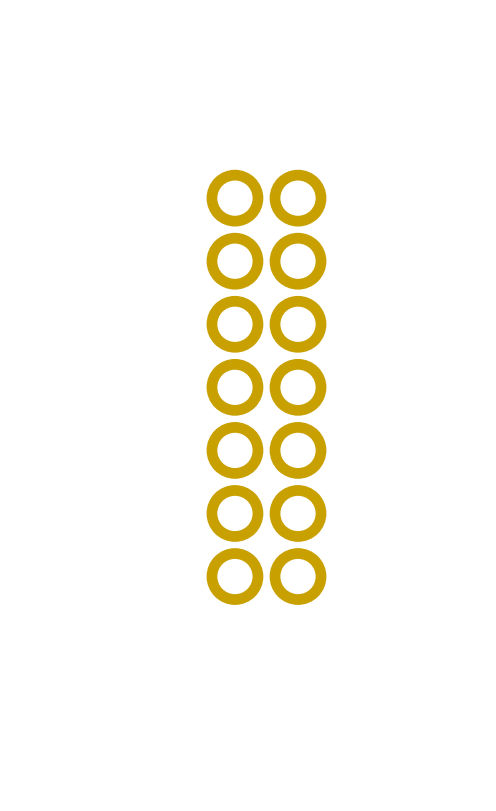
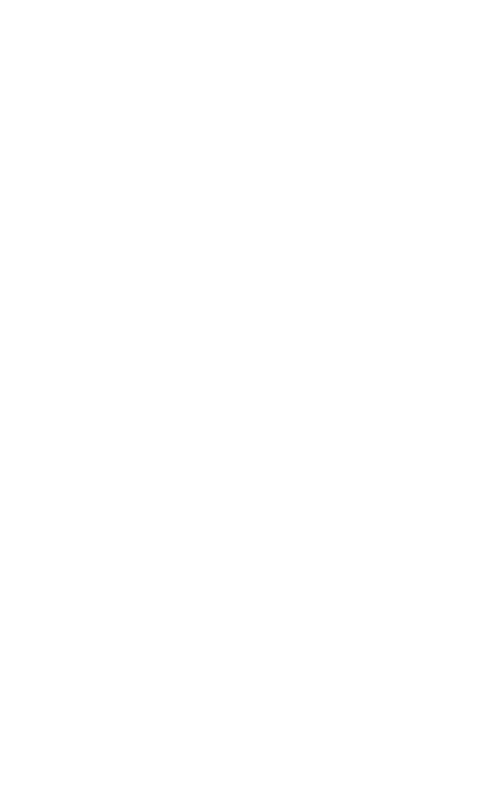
part: (266, 387) -> none

